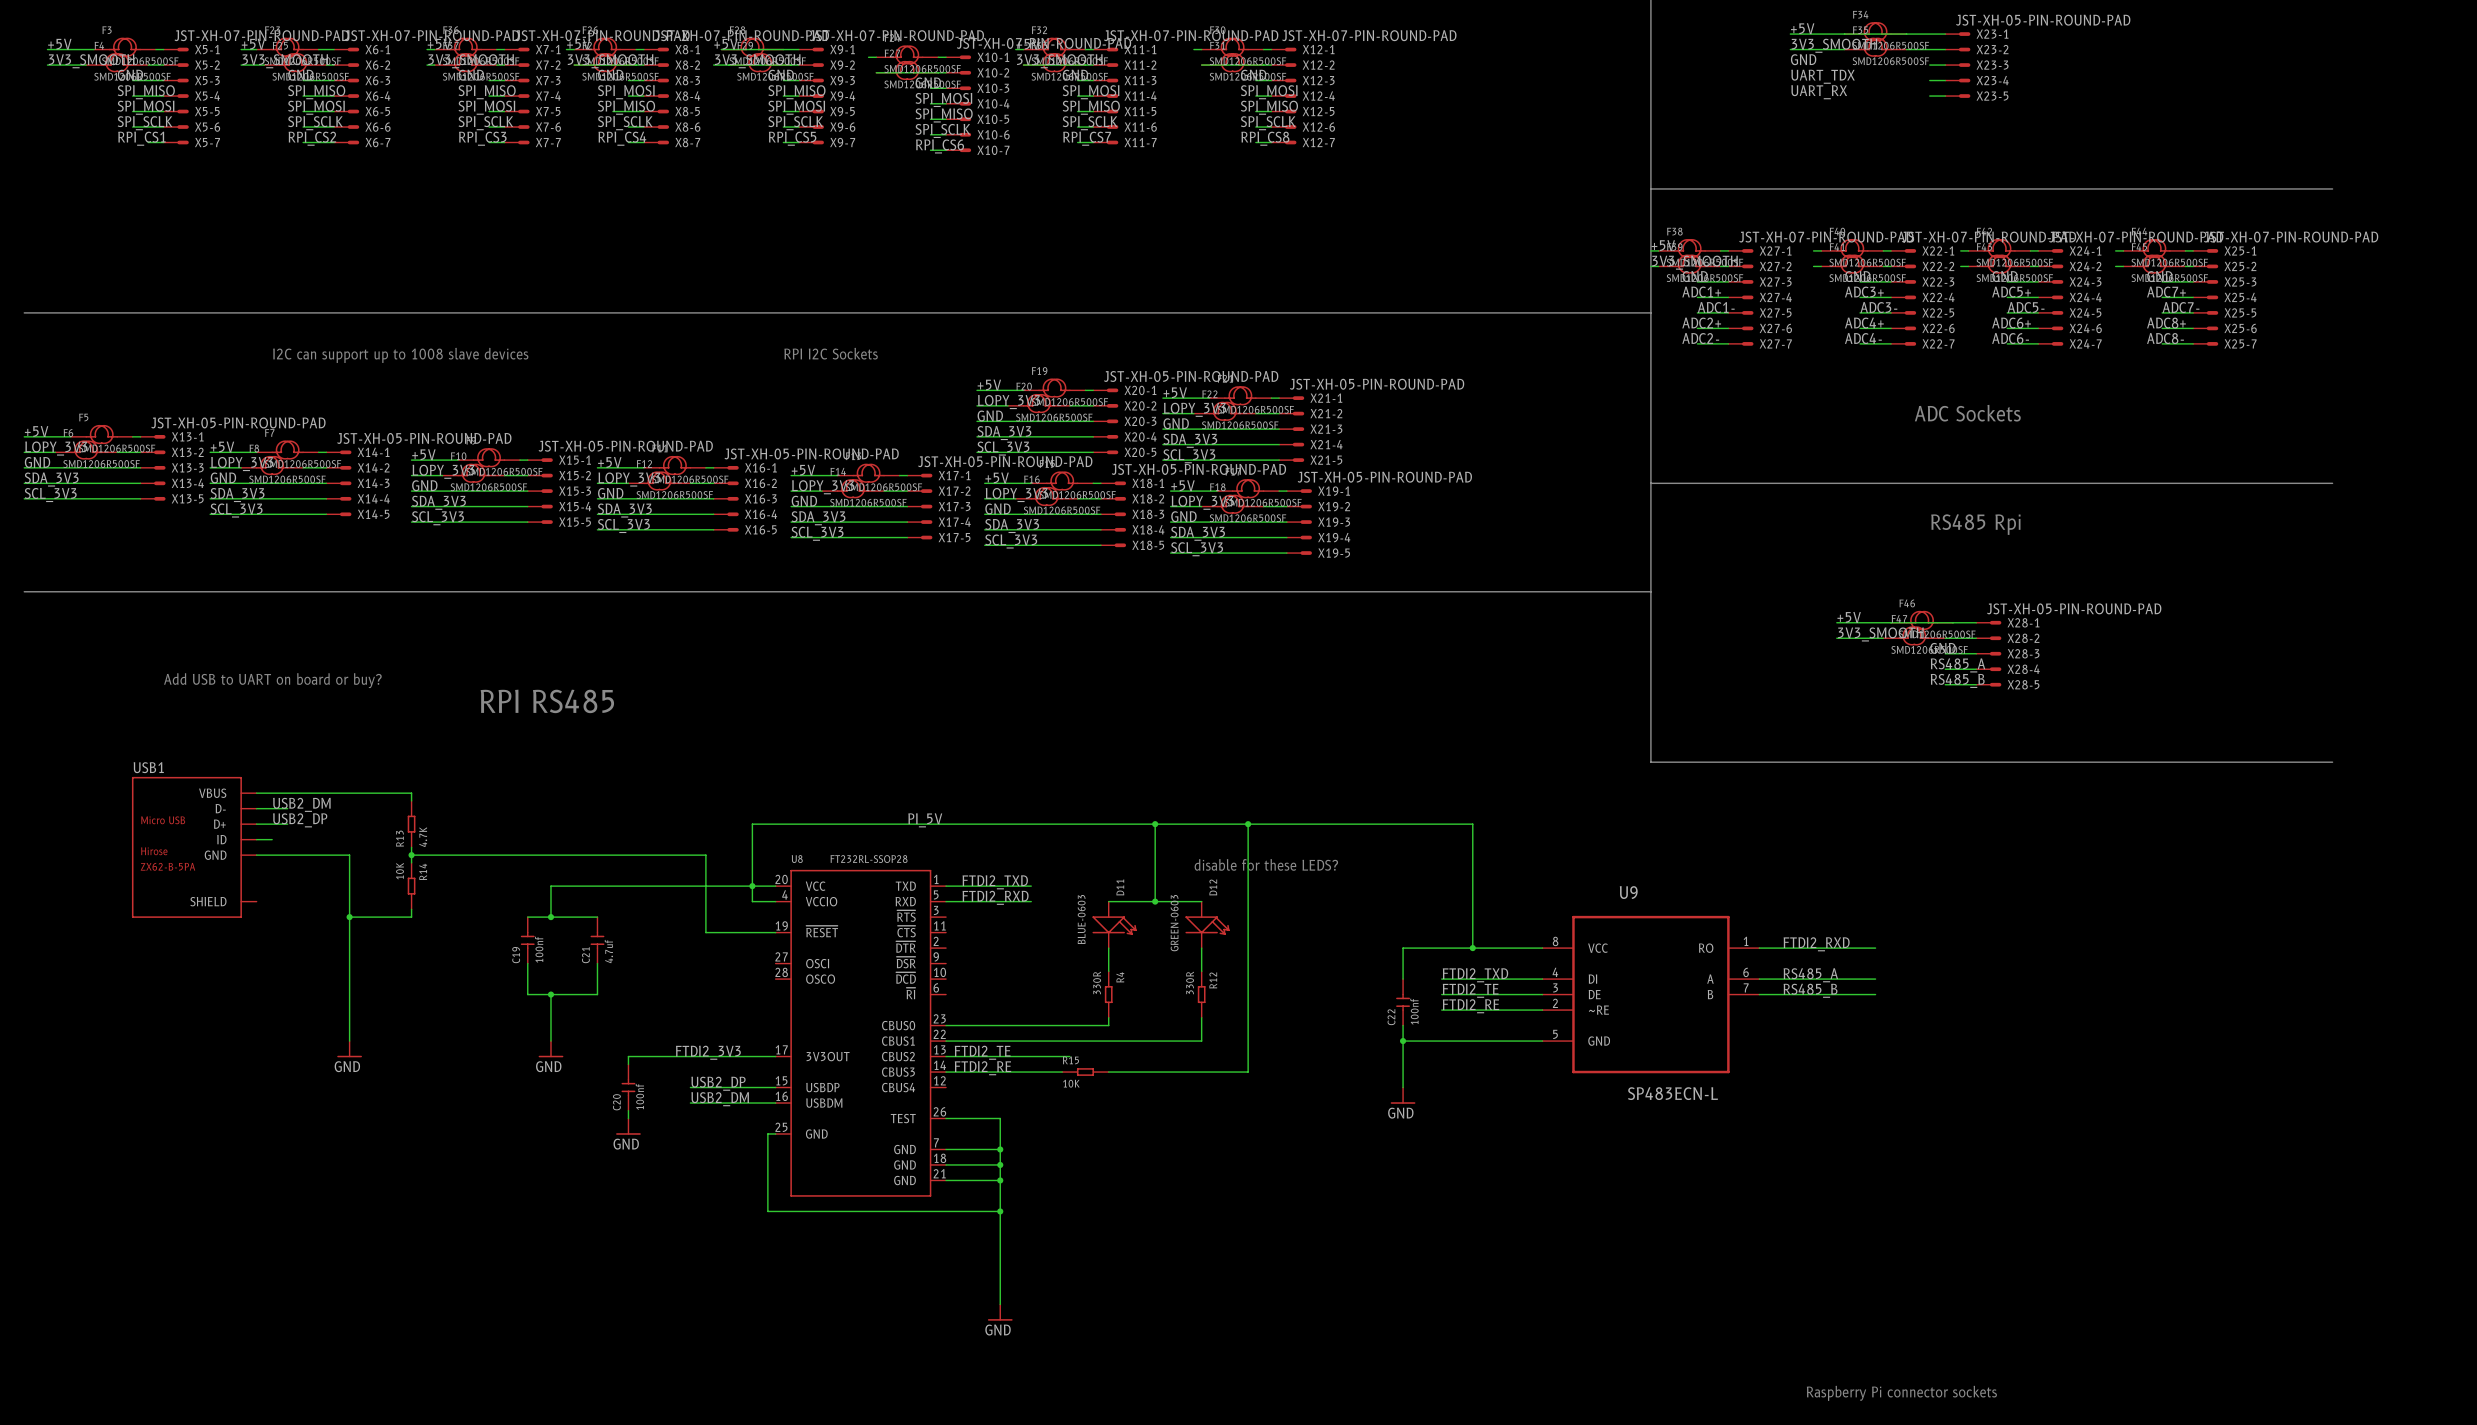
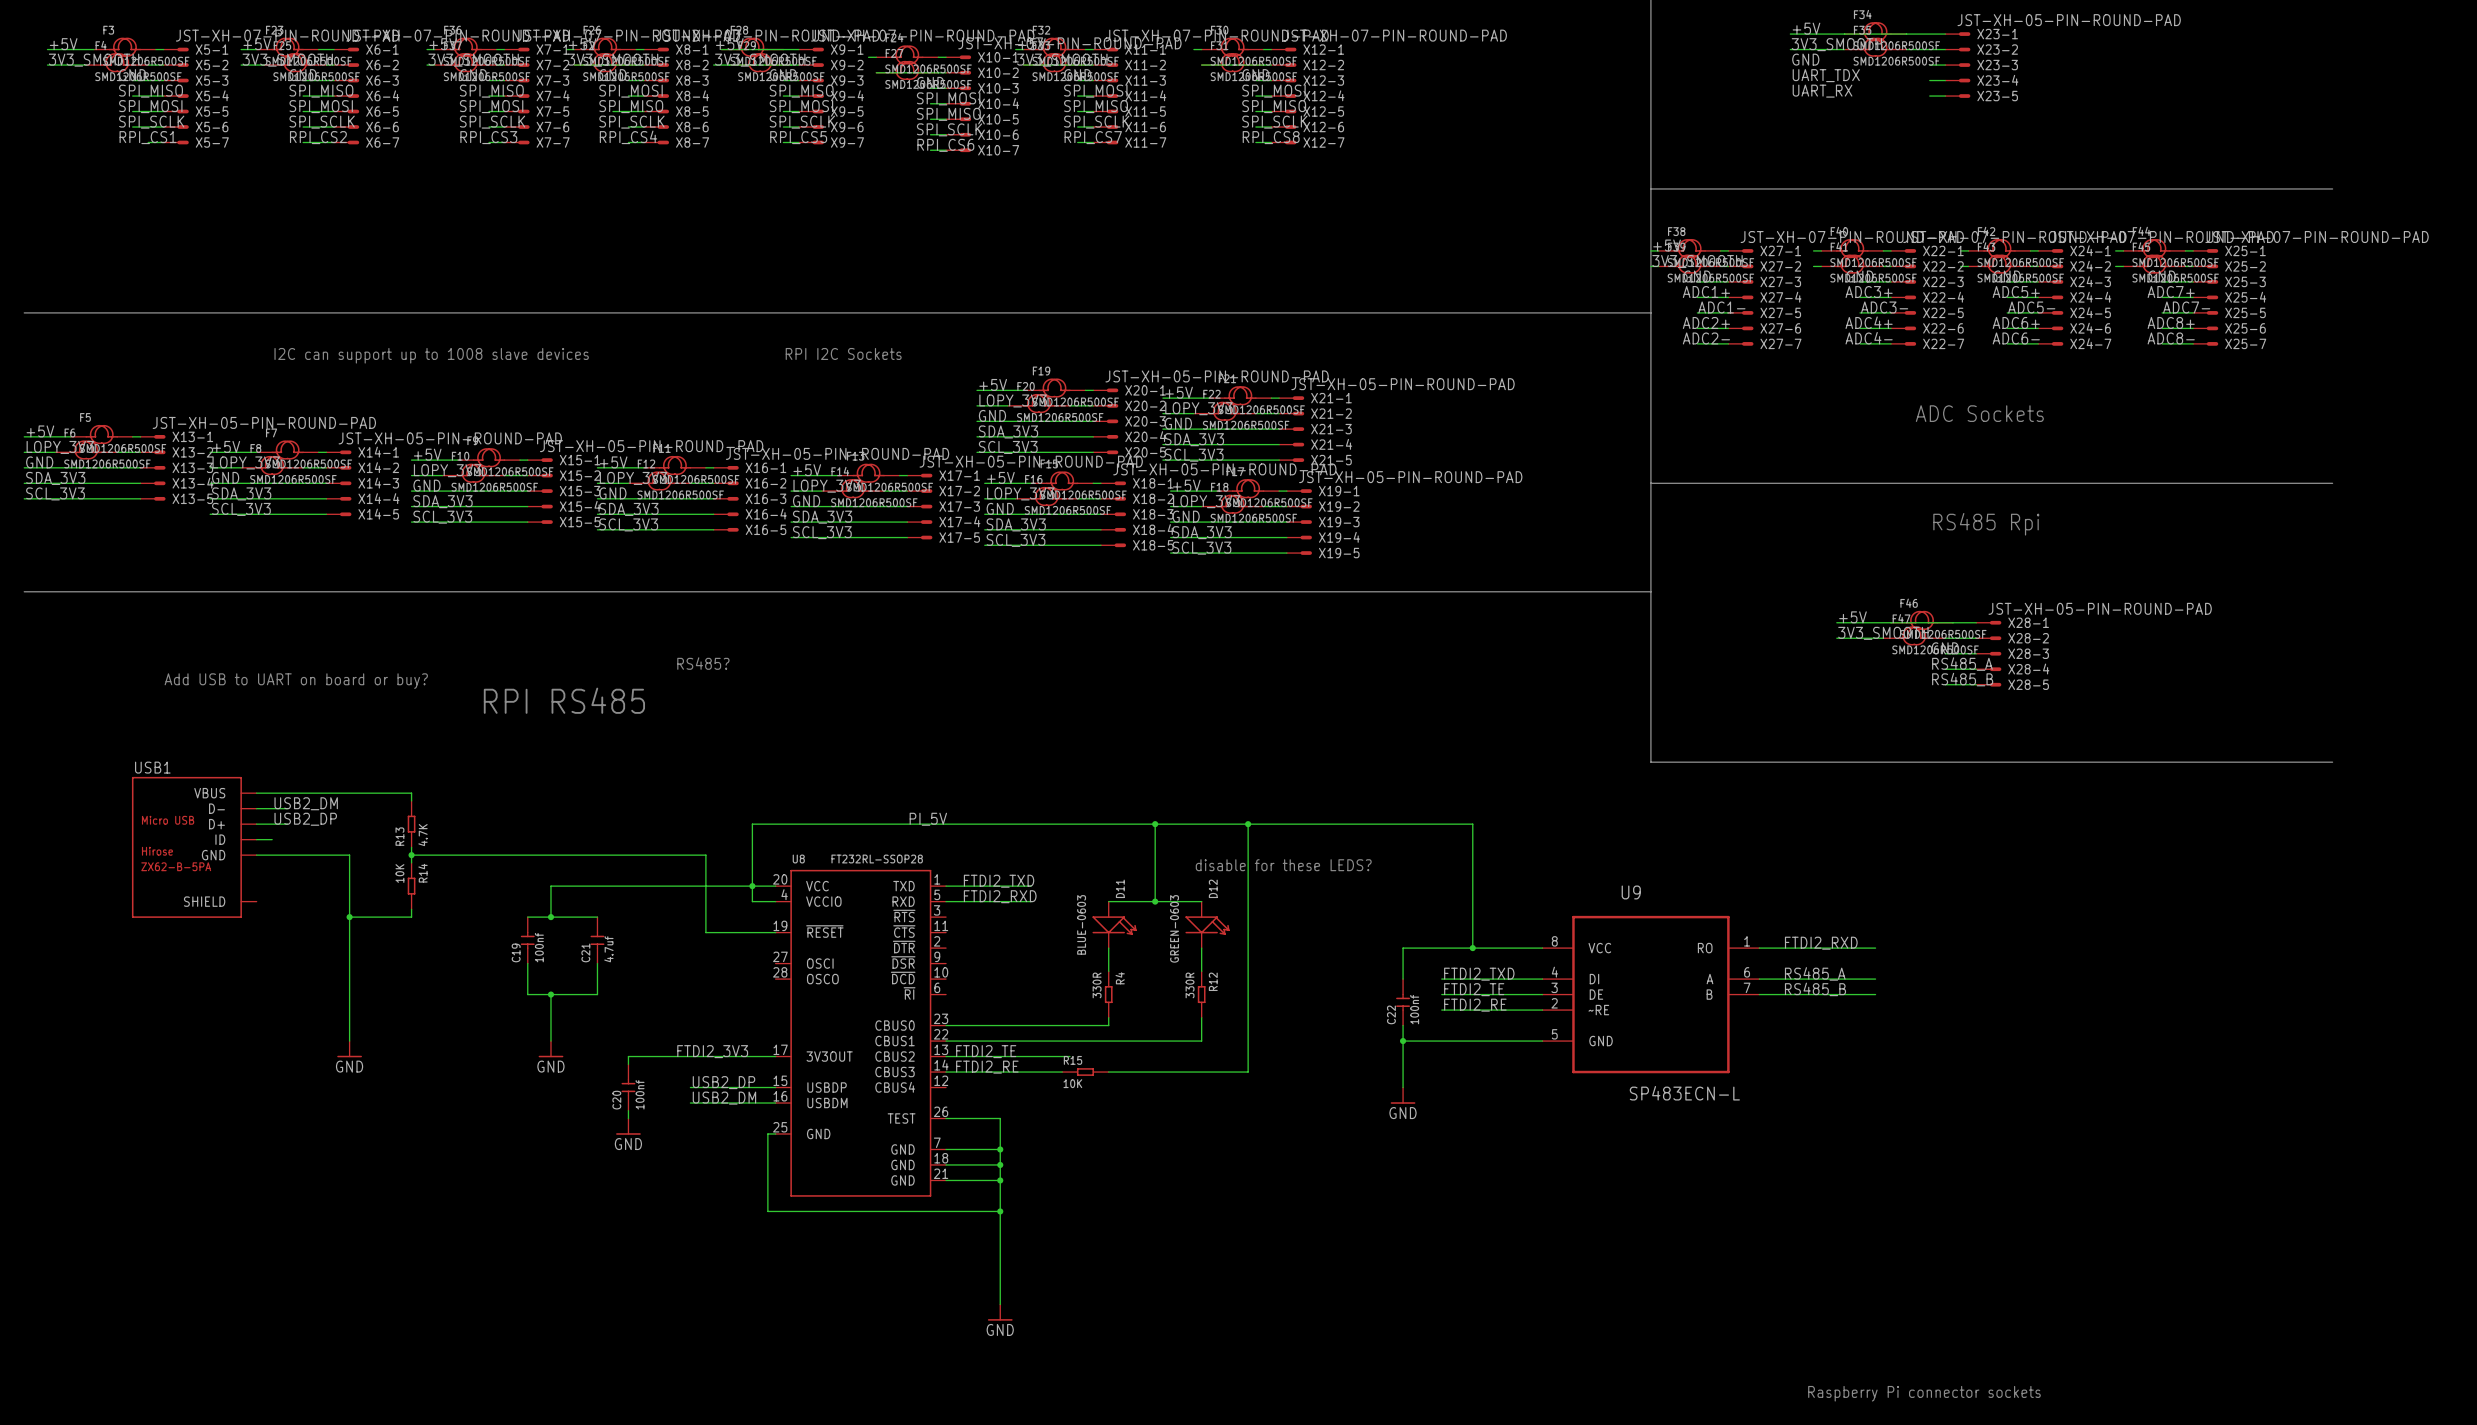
text: none -> RS485? (703, 663)

